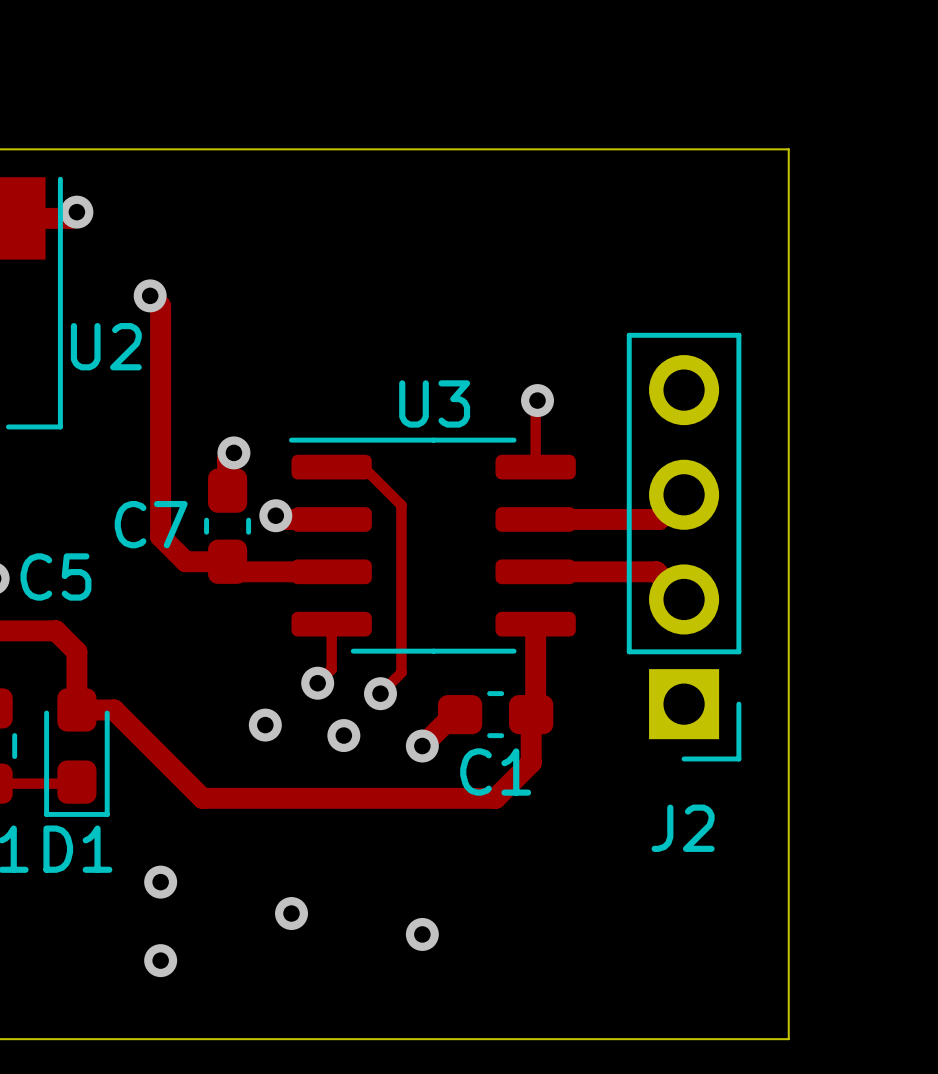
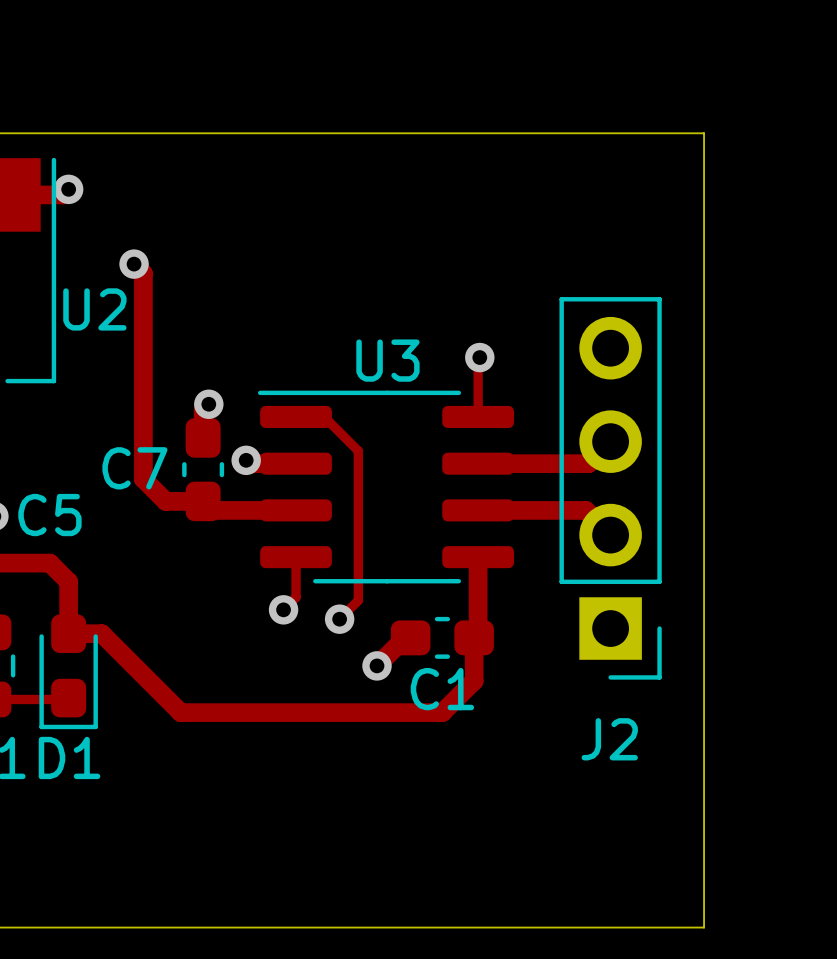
via: (265, 725) -> none
via: (343, 735) -> none
via: (160, 882) -> none
via: (291, 913) -> none
via: (422, 934) -> none
via: (160, 960) -> none

